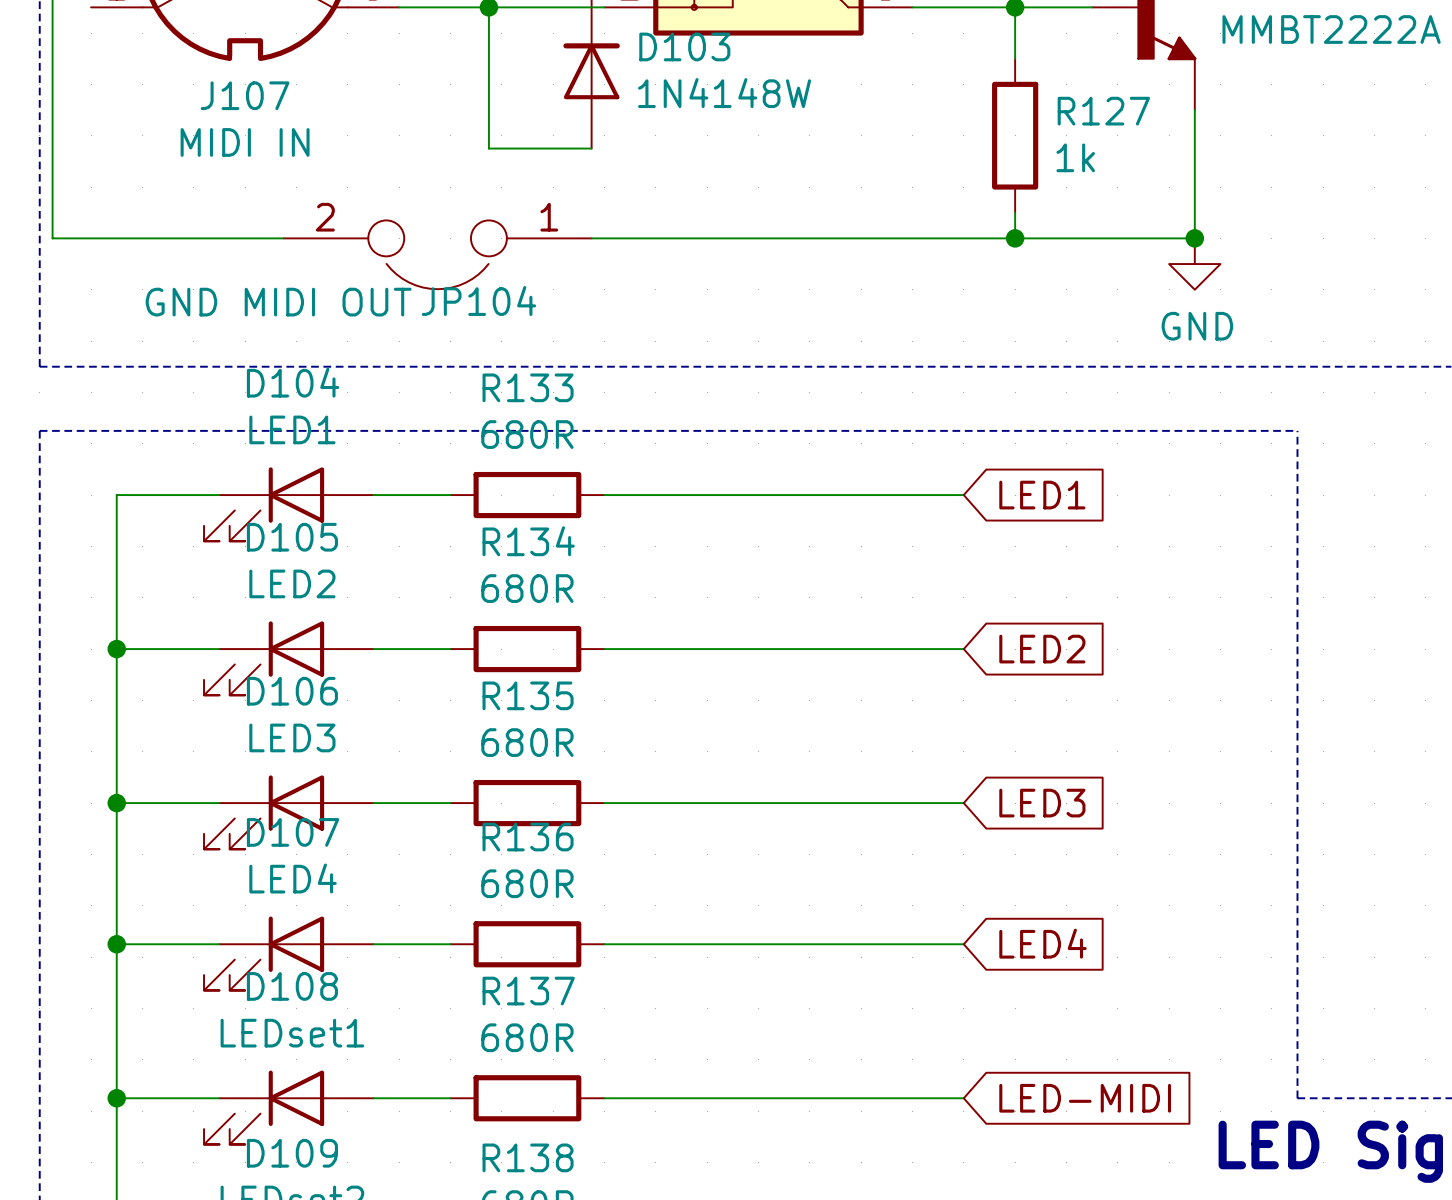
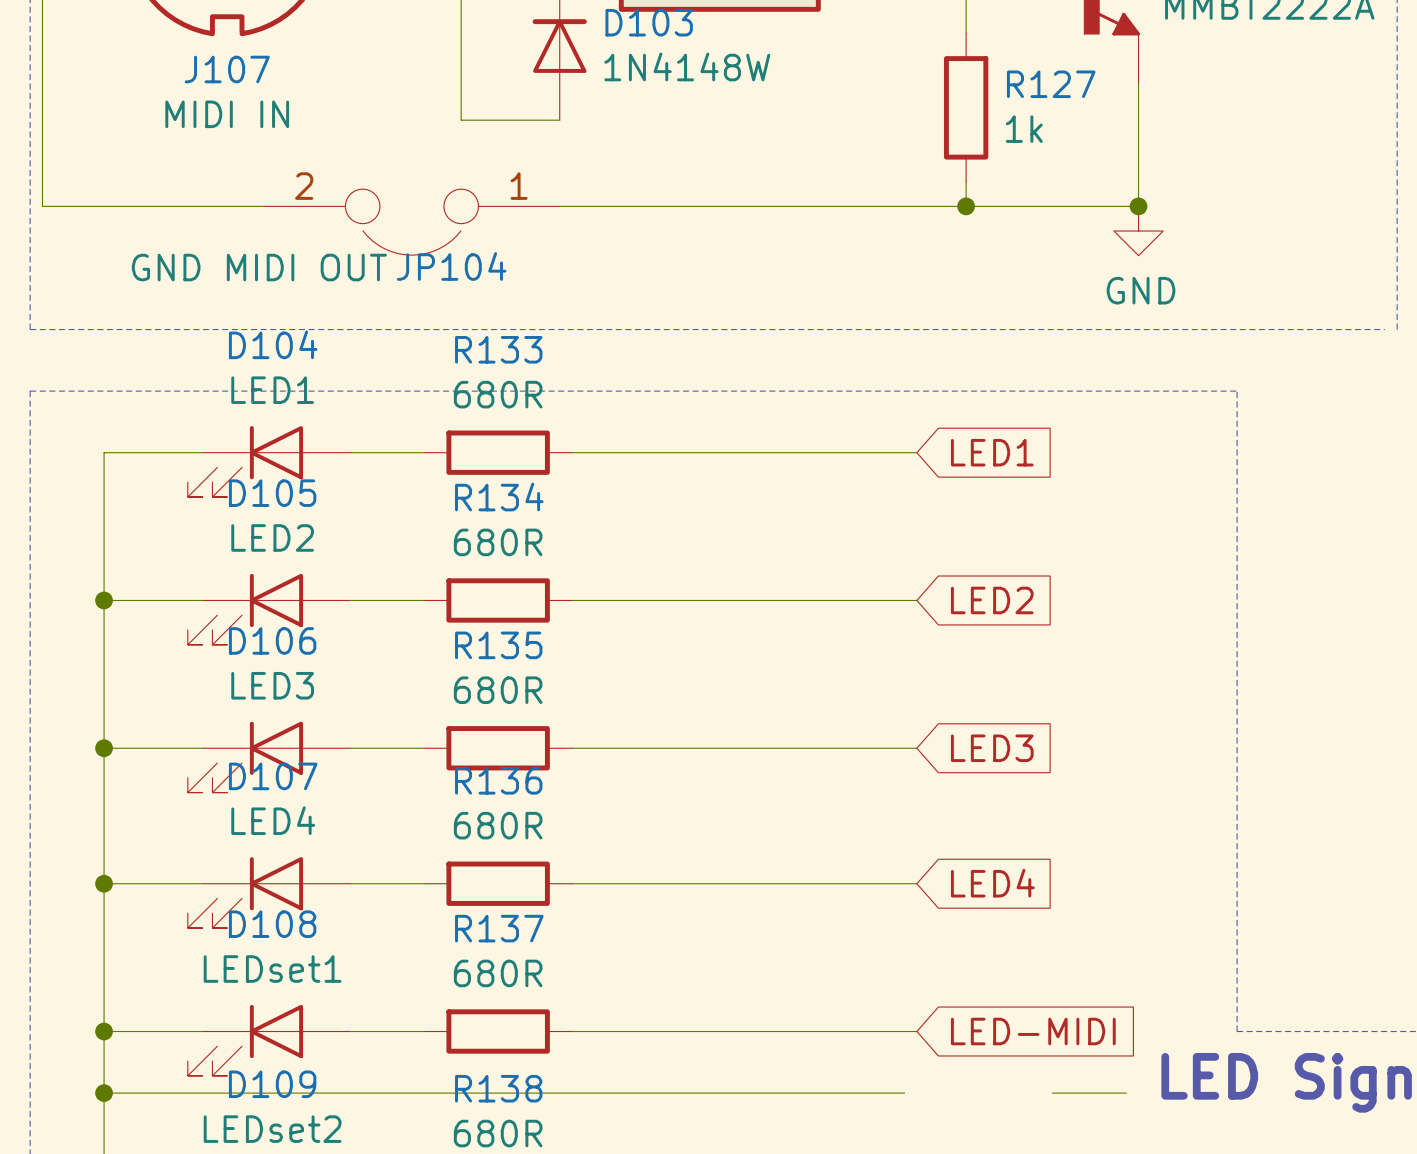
wire: none -> (104, 1093) (904, 1093)
junction: none -> (104, 1093)
wire: none -> (1052, 1093) (1126, 1093)

